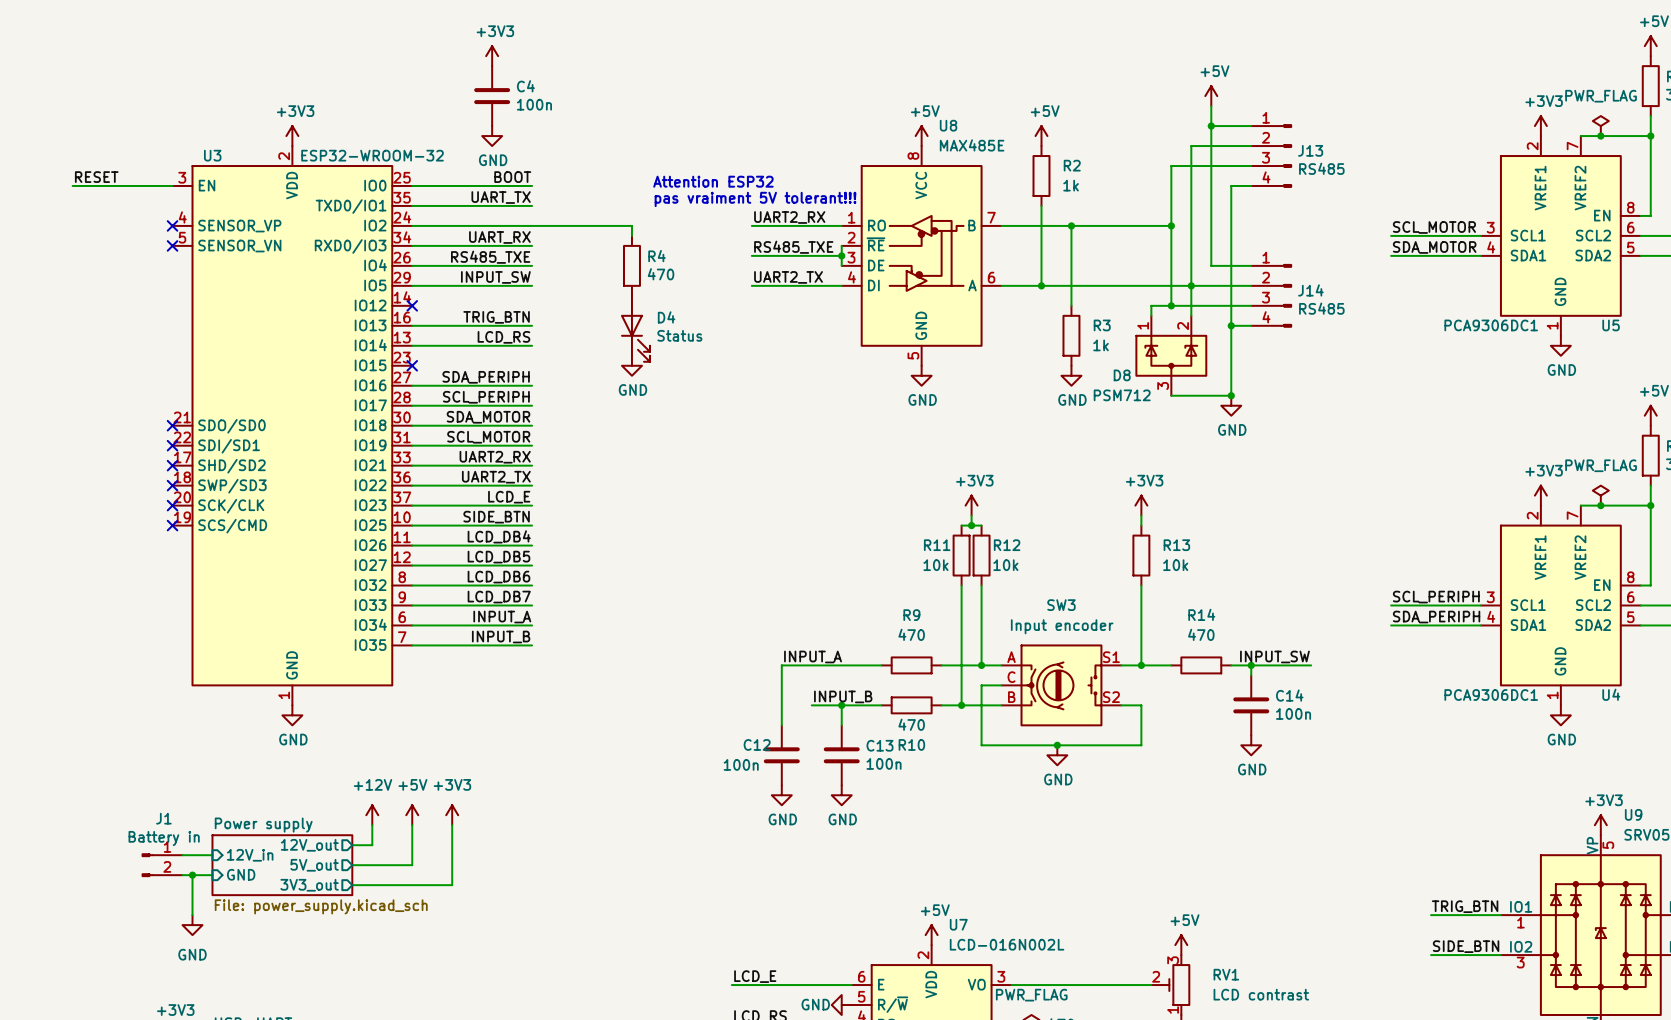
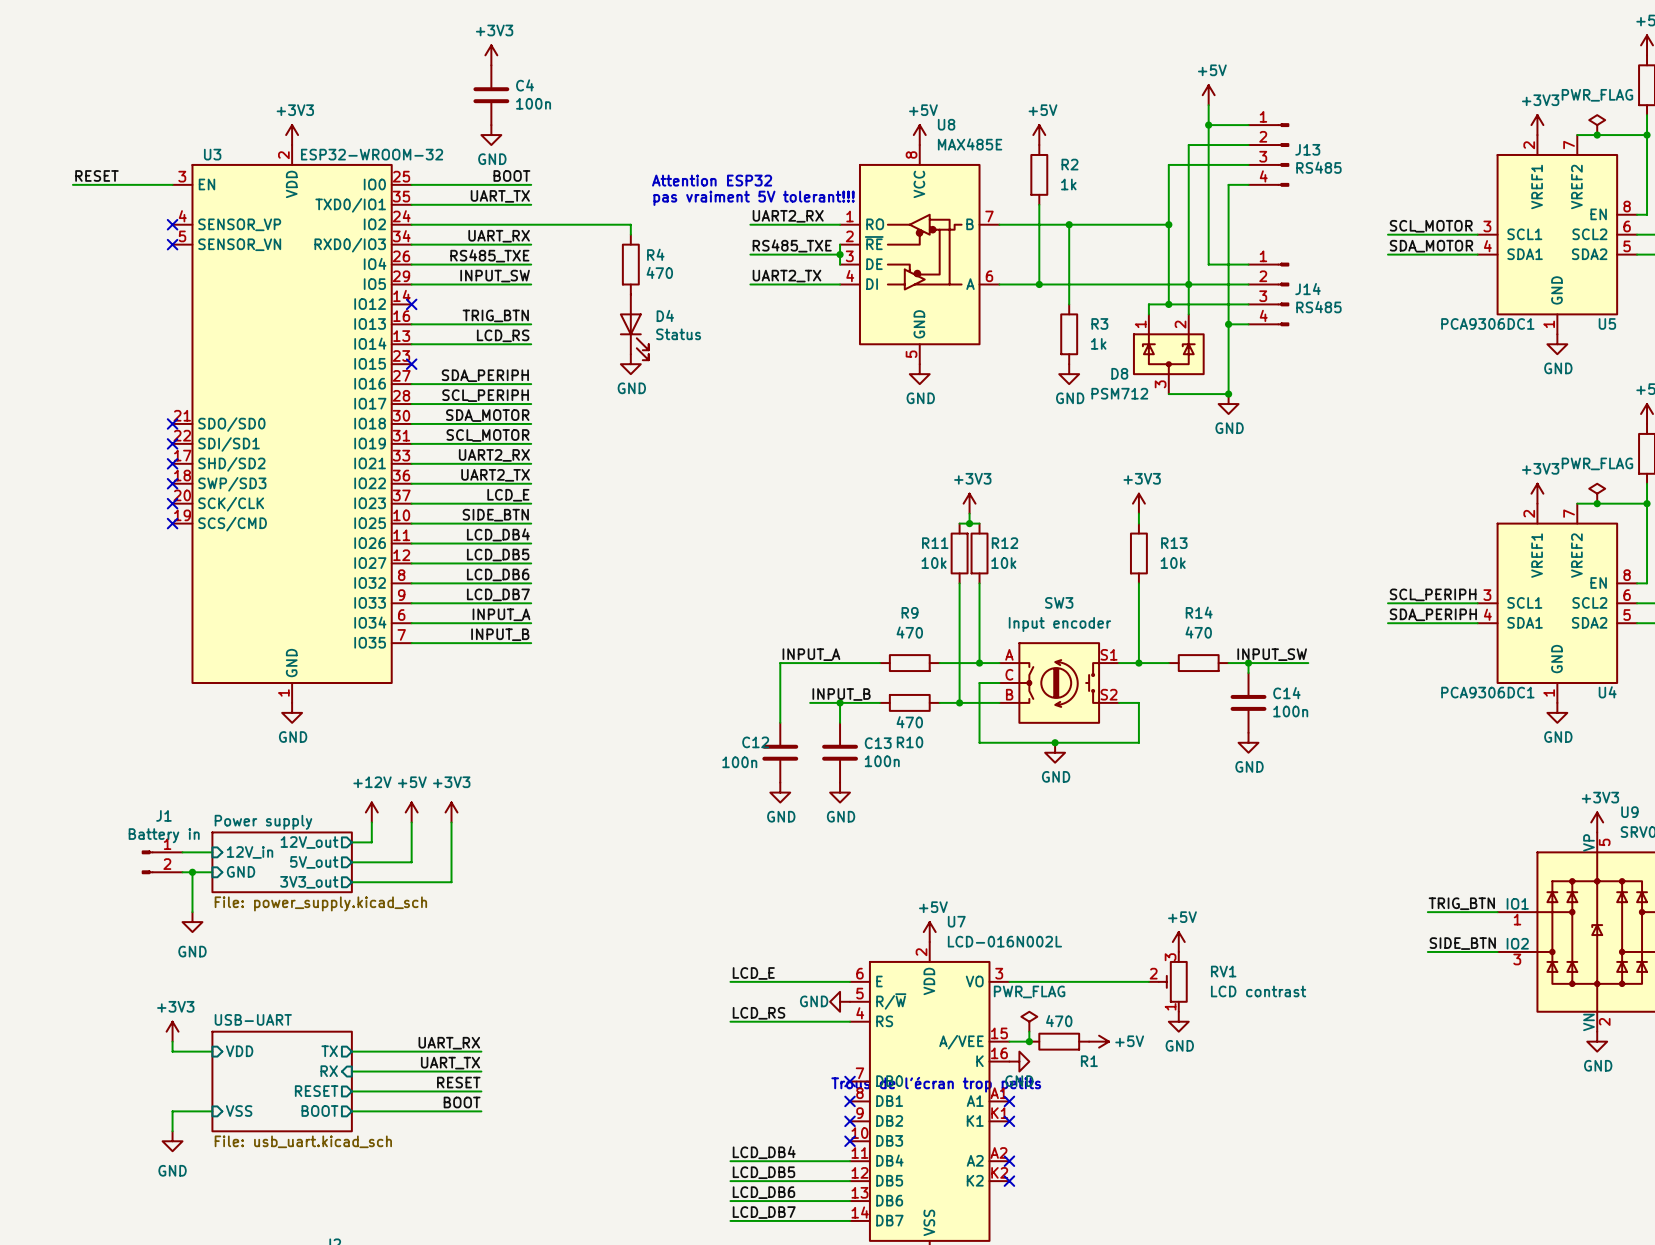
SW3 symbol: [1001, 644, 1122, 727] -> [999, 642, 1120, 724]

